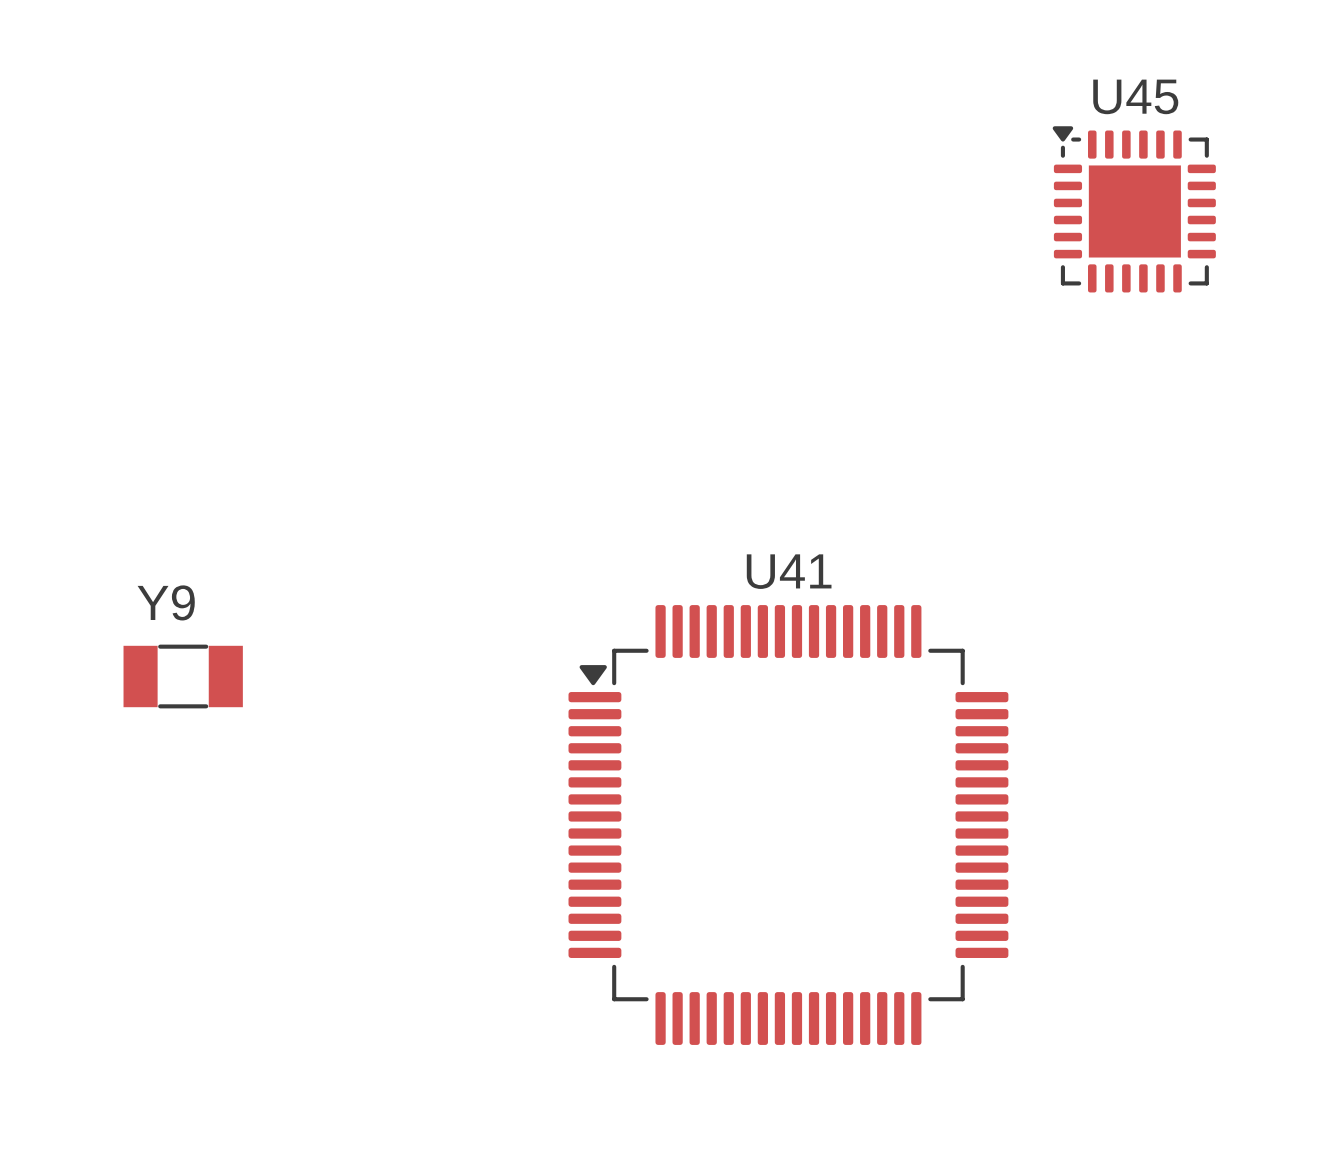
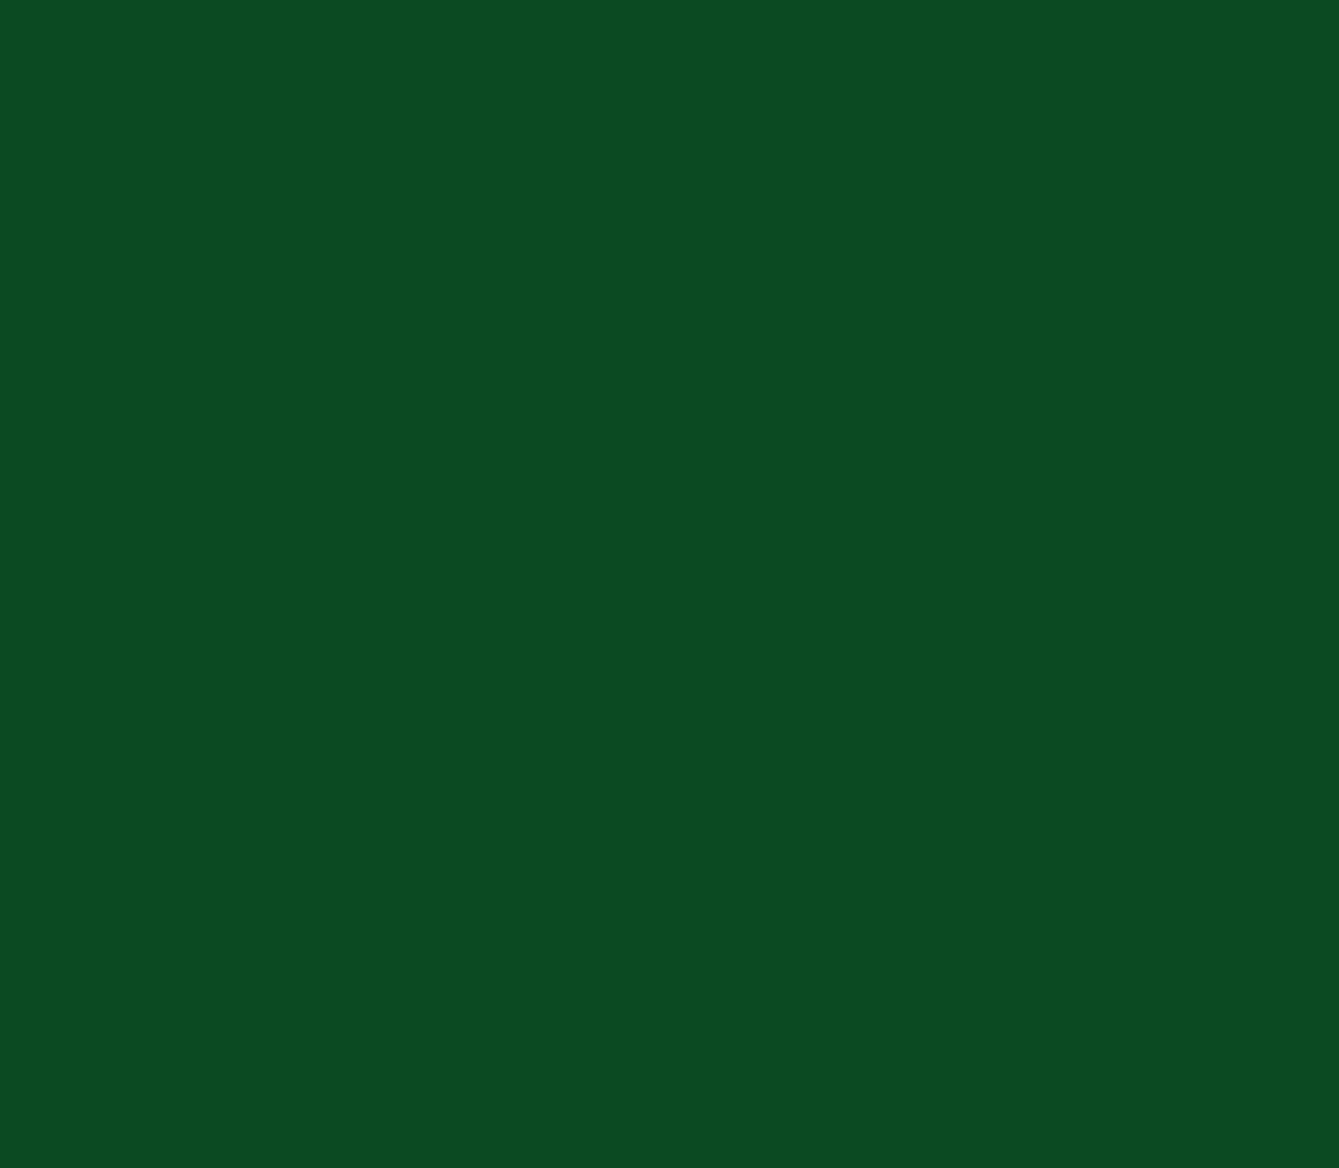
U45: (1134, 209) -> none
Y9: (183, 676) -> none
U41: (788, 825) -> none

